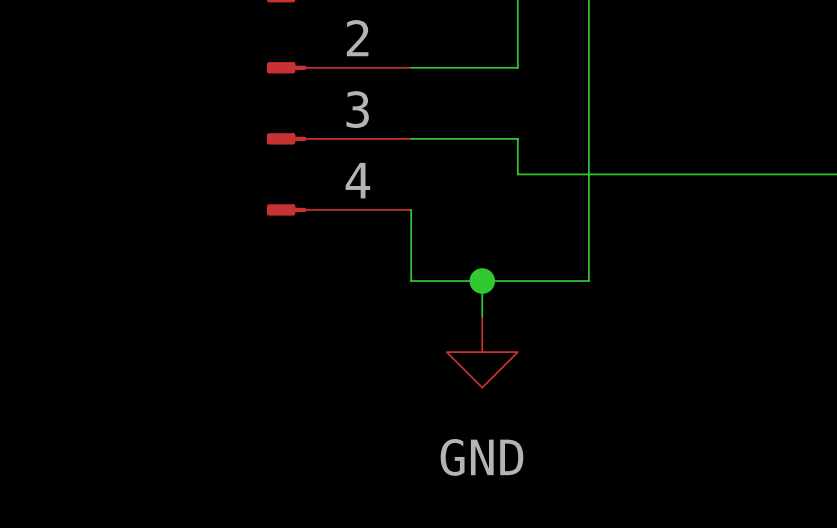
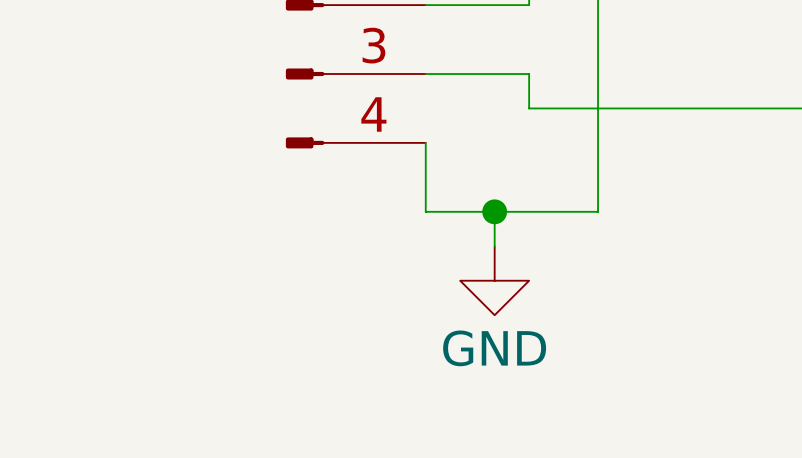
power symbol text position: GND (481, 457) -> GND (494, 348)

